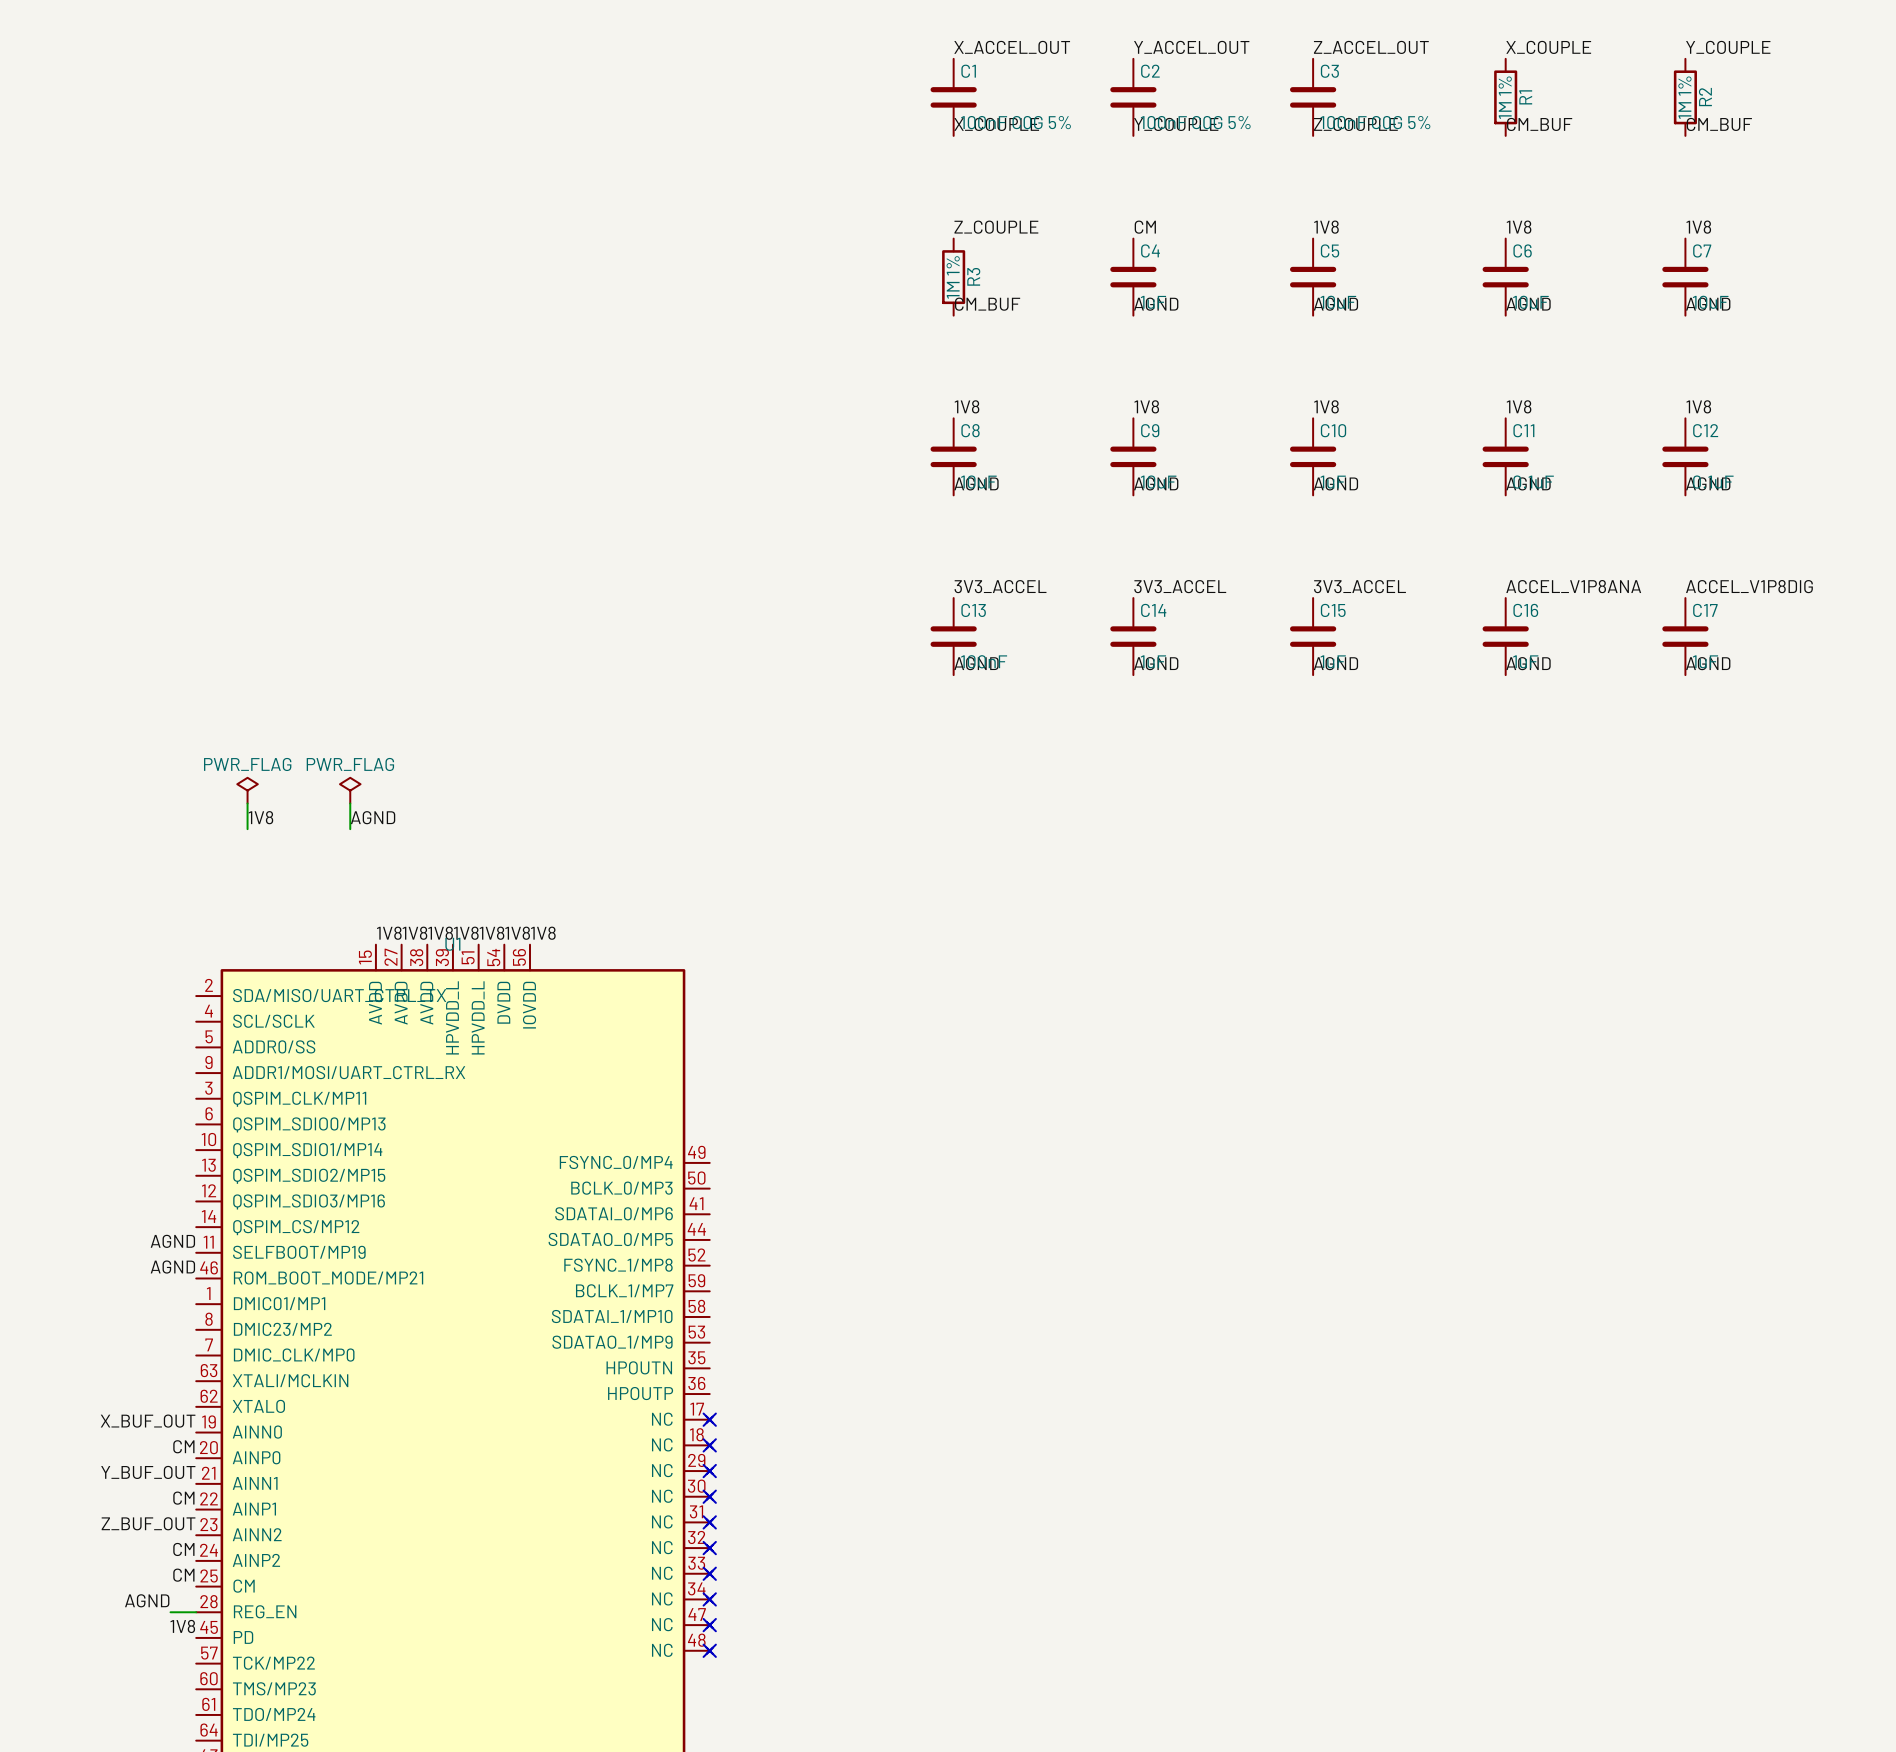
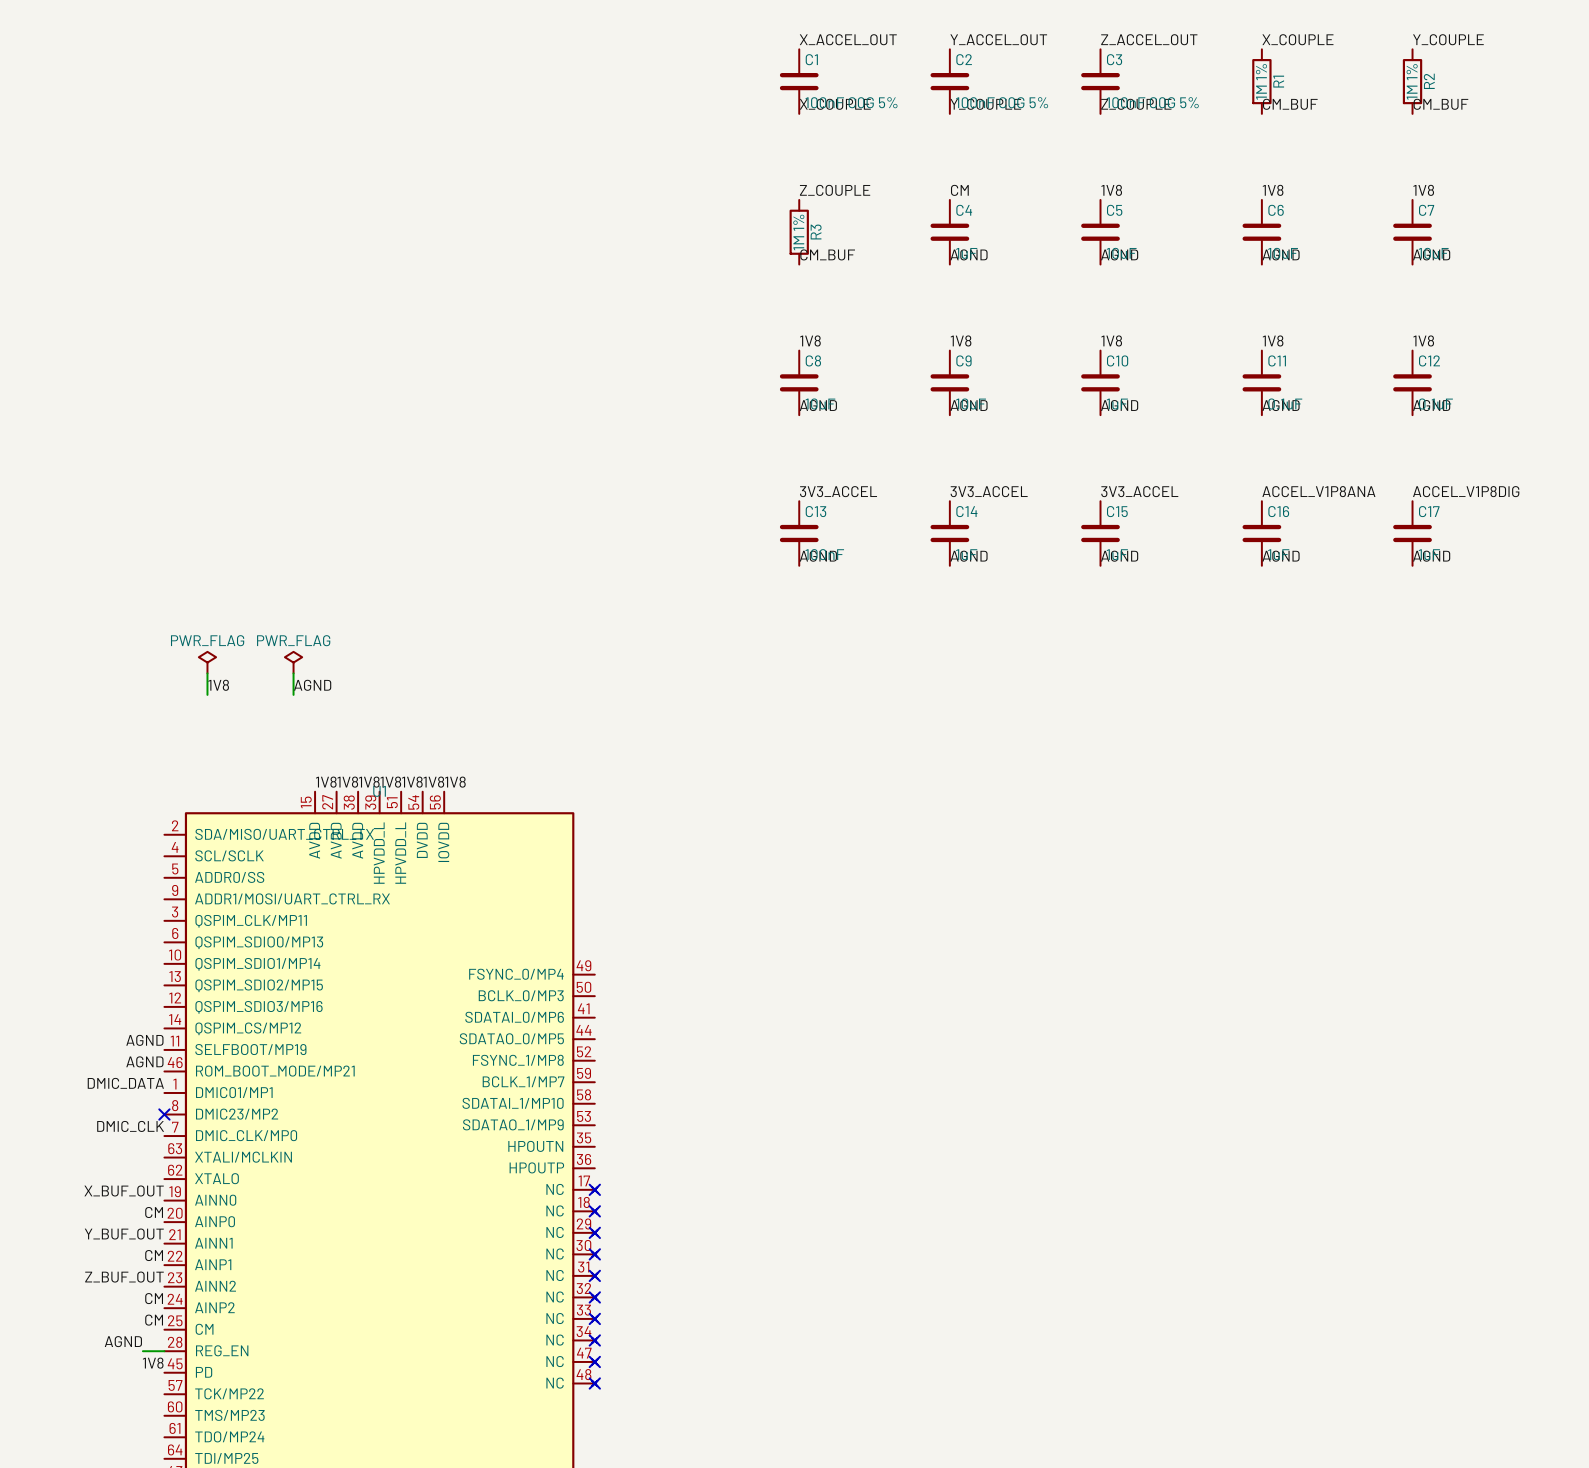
label: none -> DMIC_DATA (125, 1083)
no-connect mark: none -> (164, 1114)
label: none -> DMIC_CLK (130, 1126)

